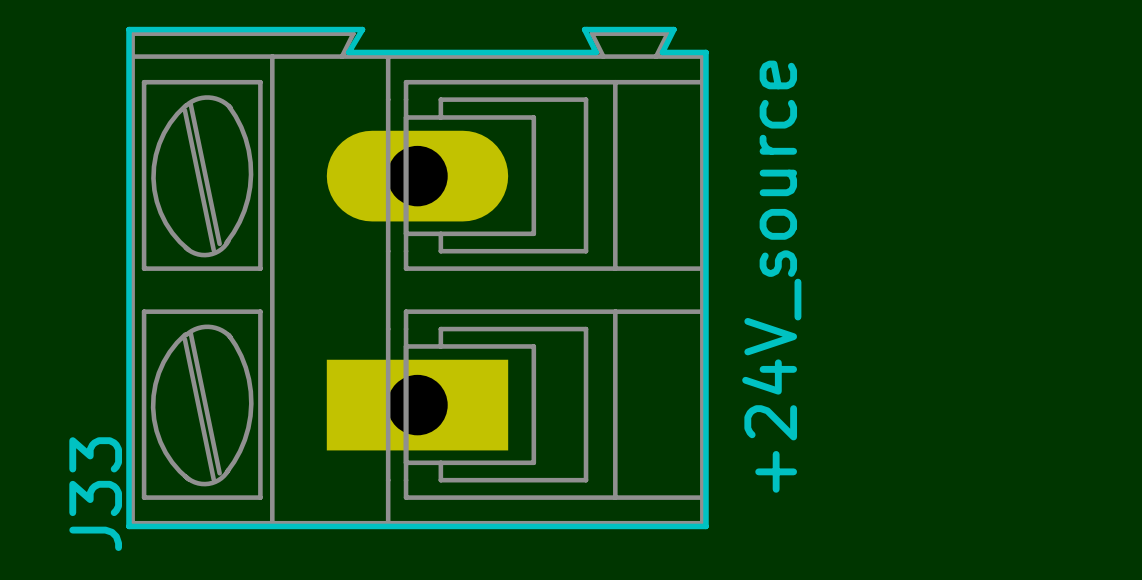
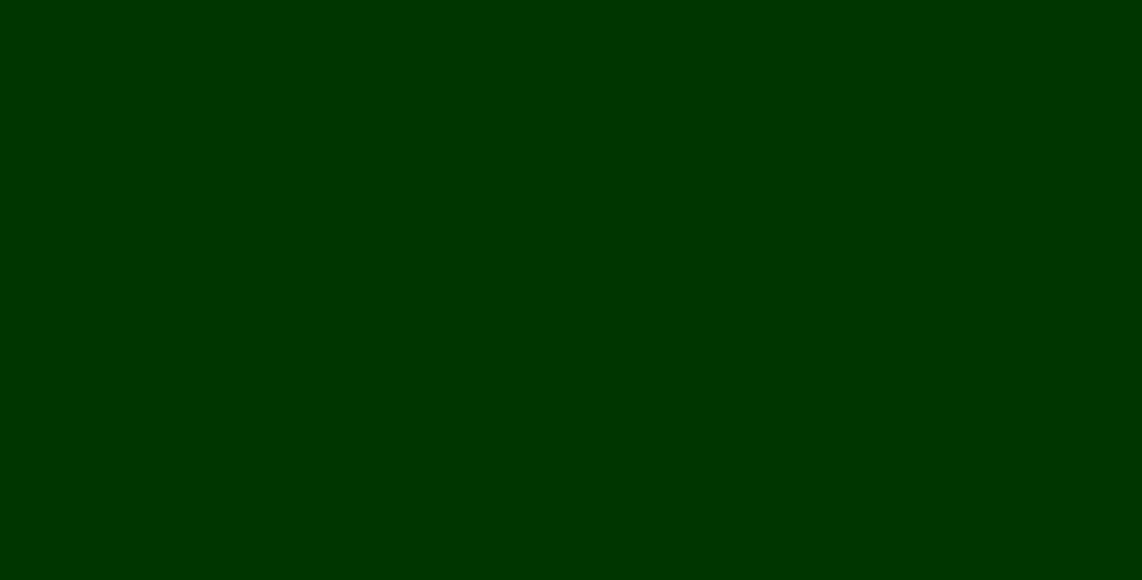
J33: +24V_source (417, 278) -> none

